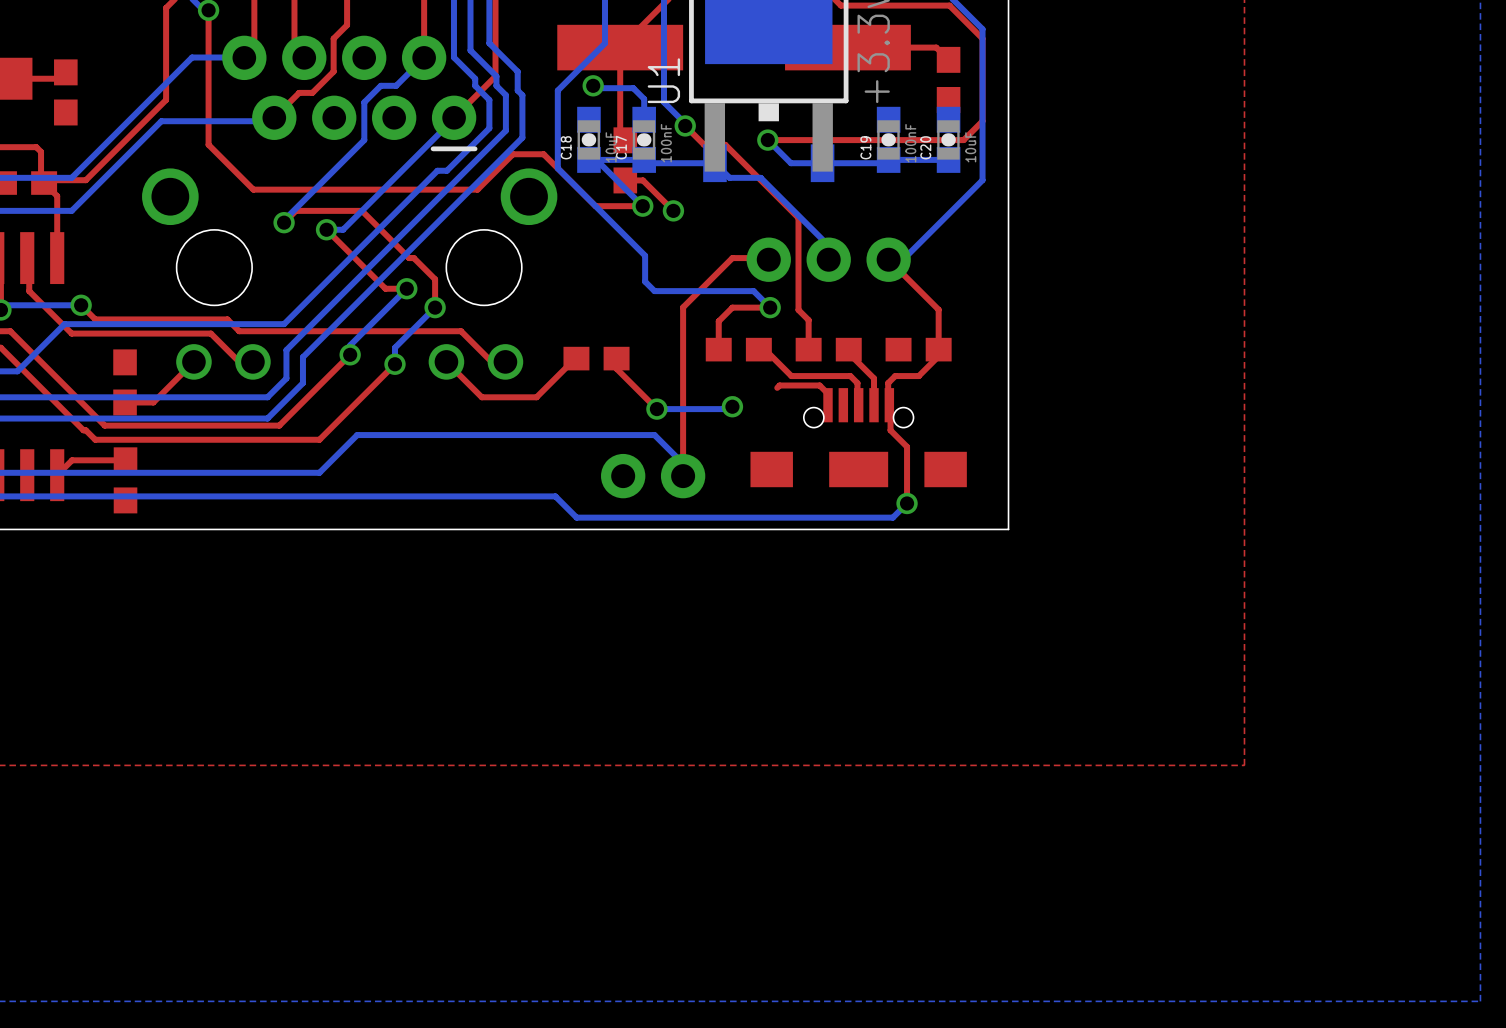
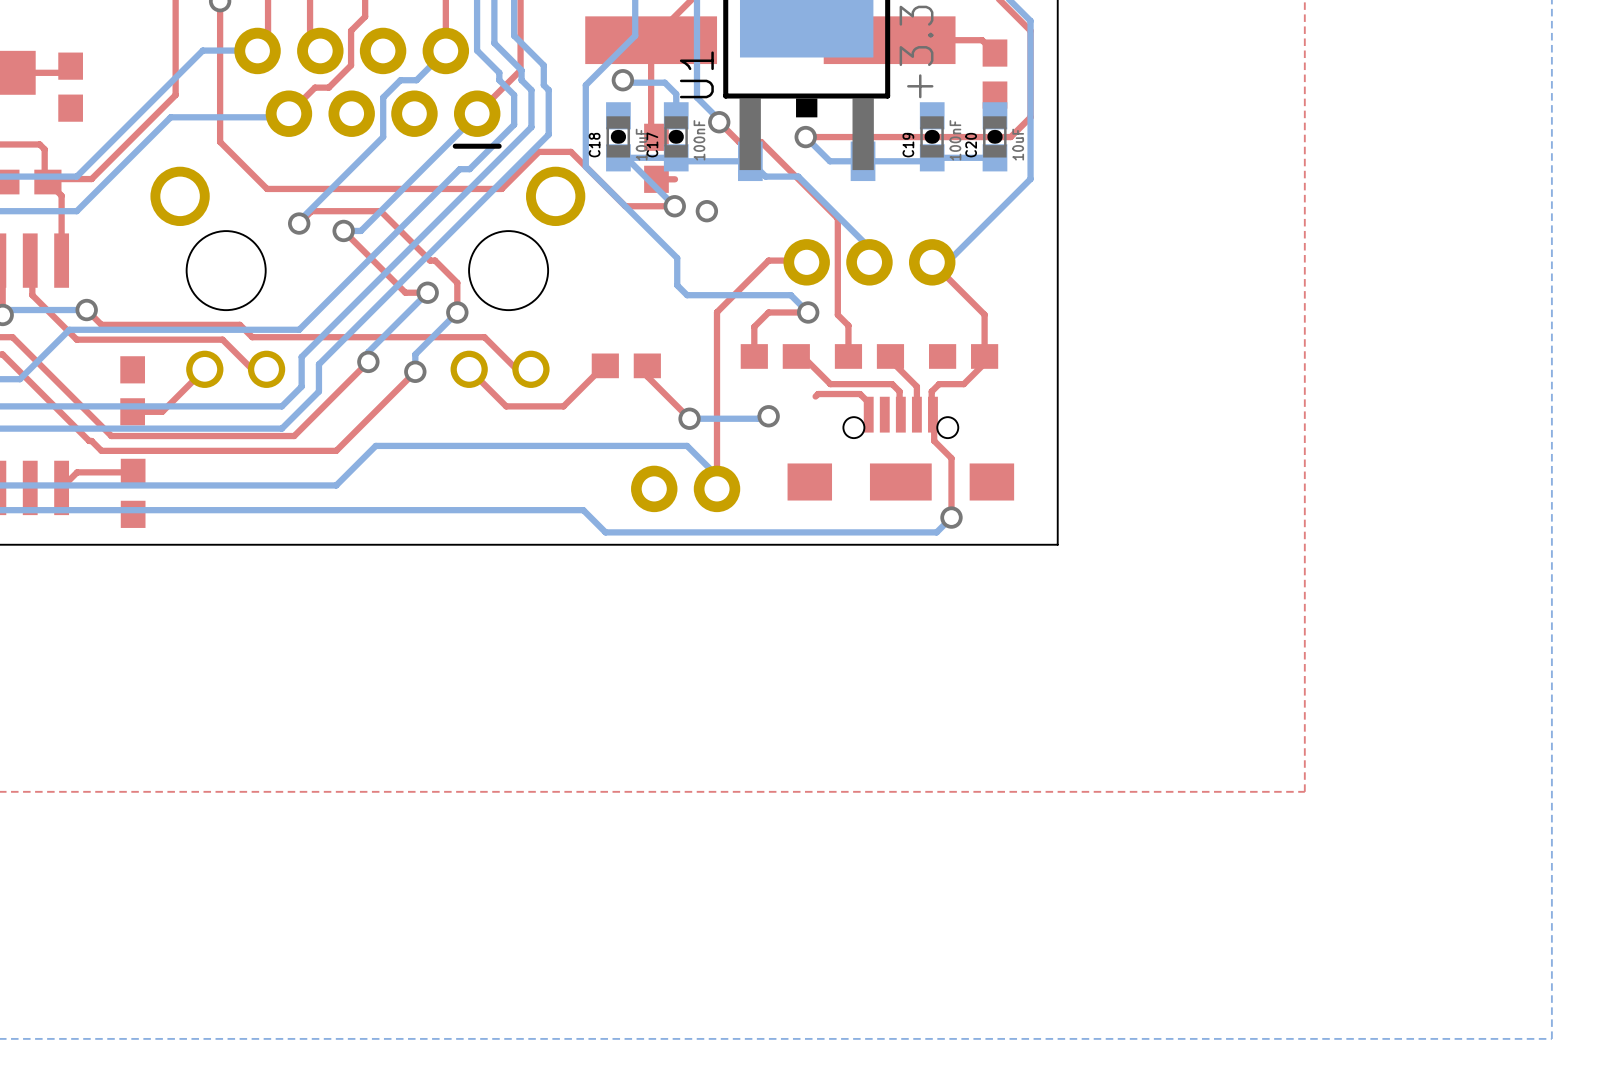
top track: (642, 180) (673, 210) -> none

